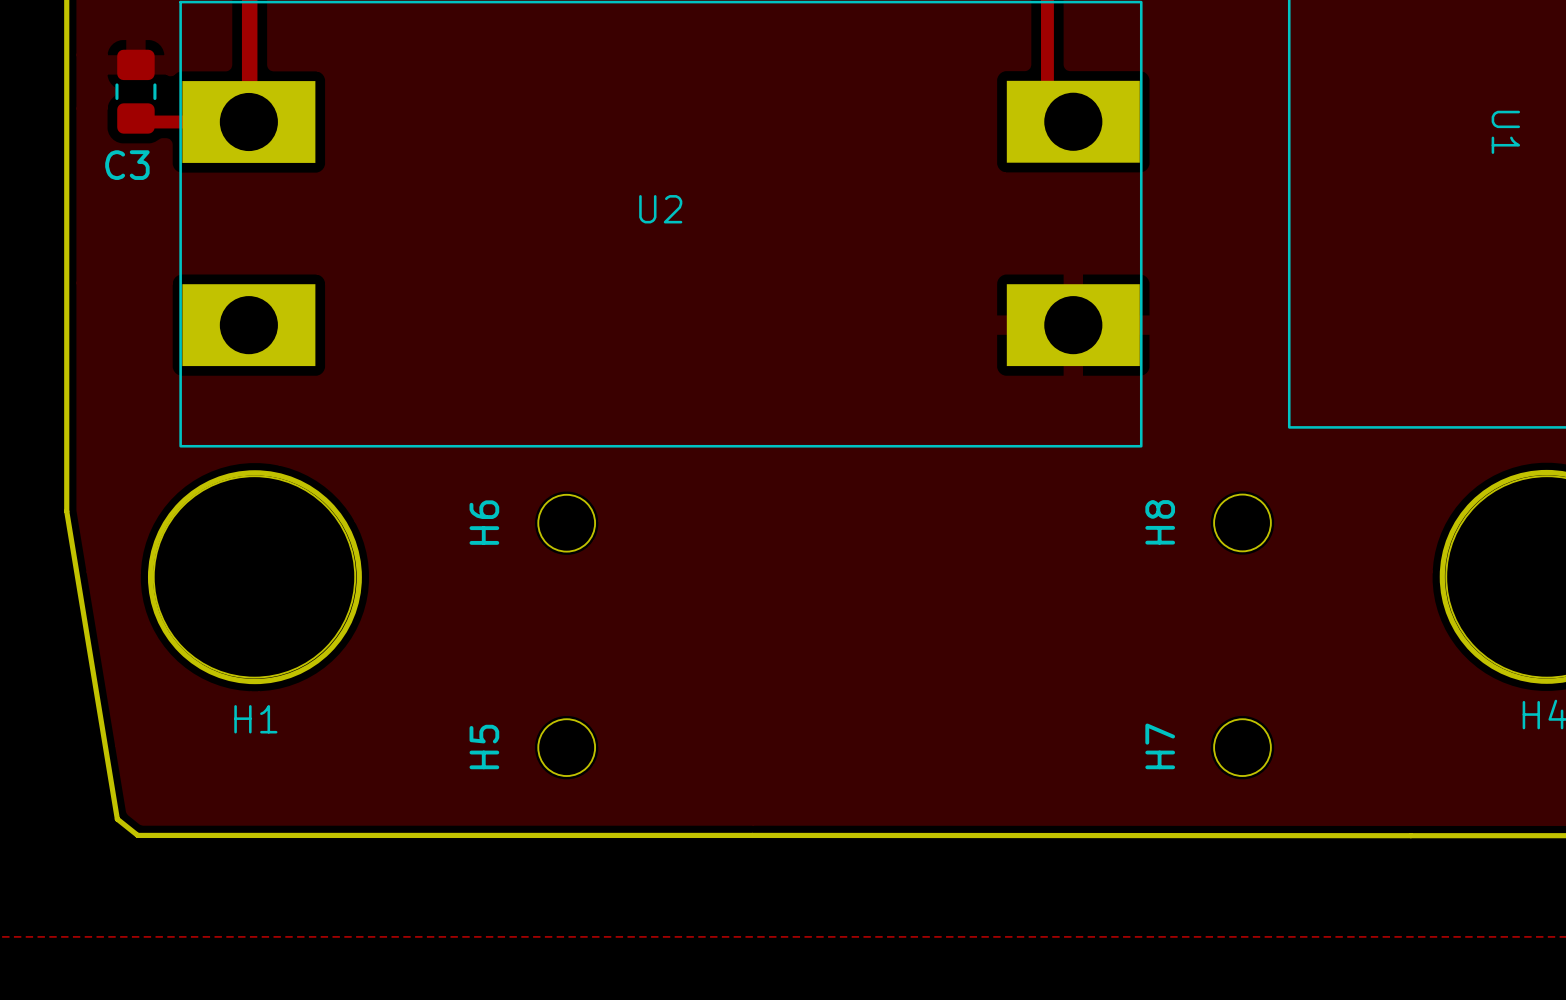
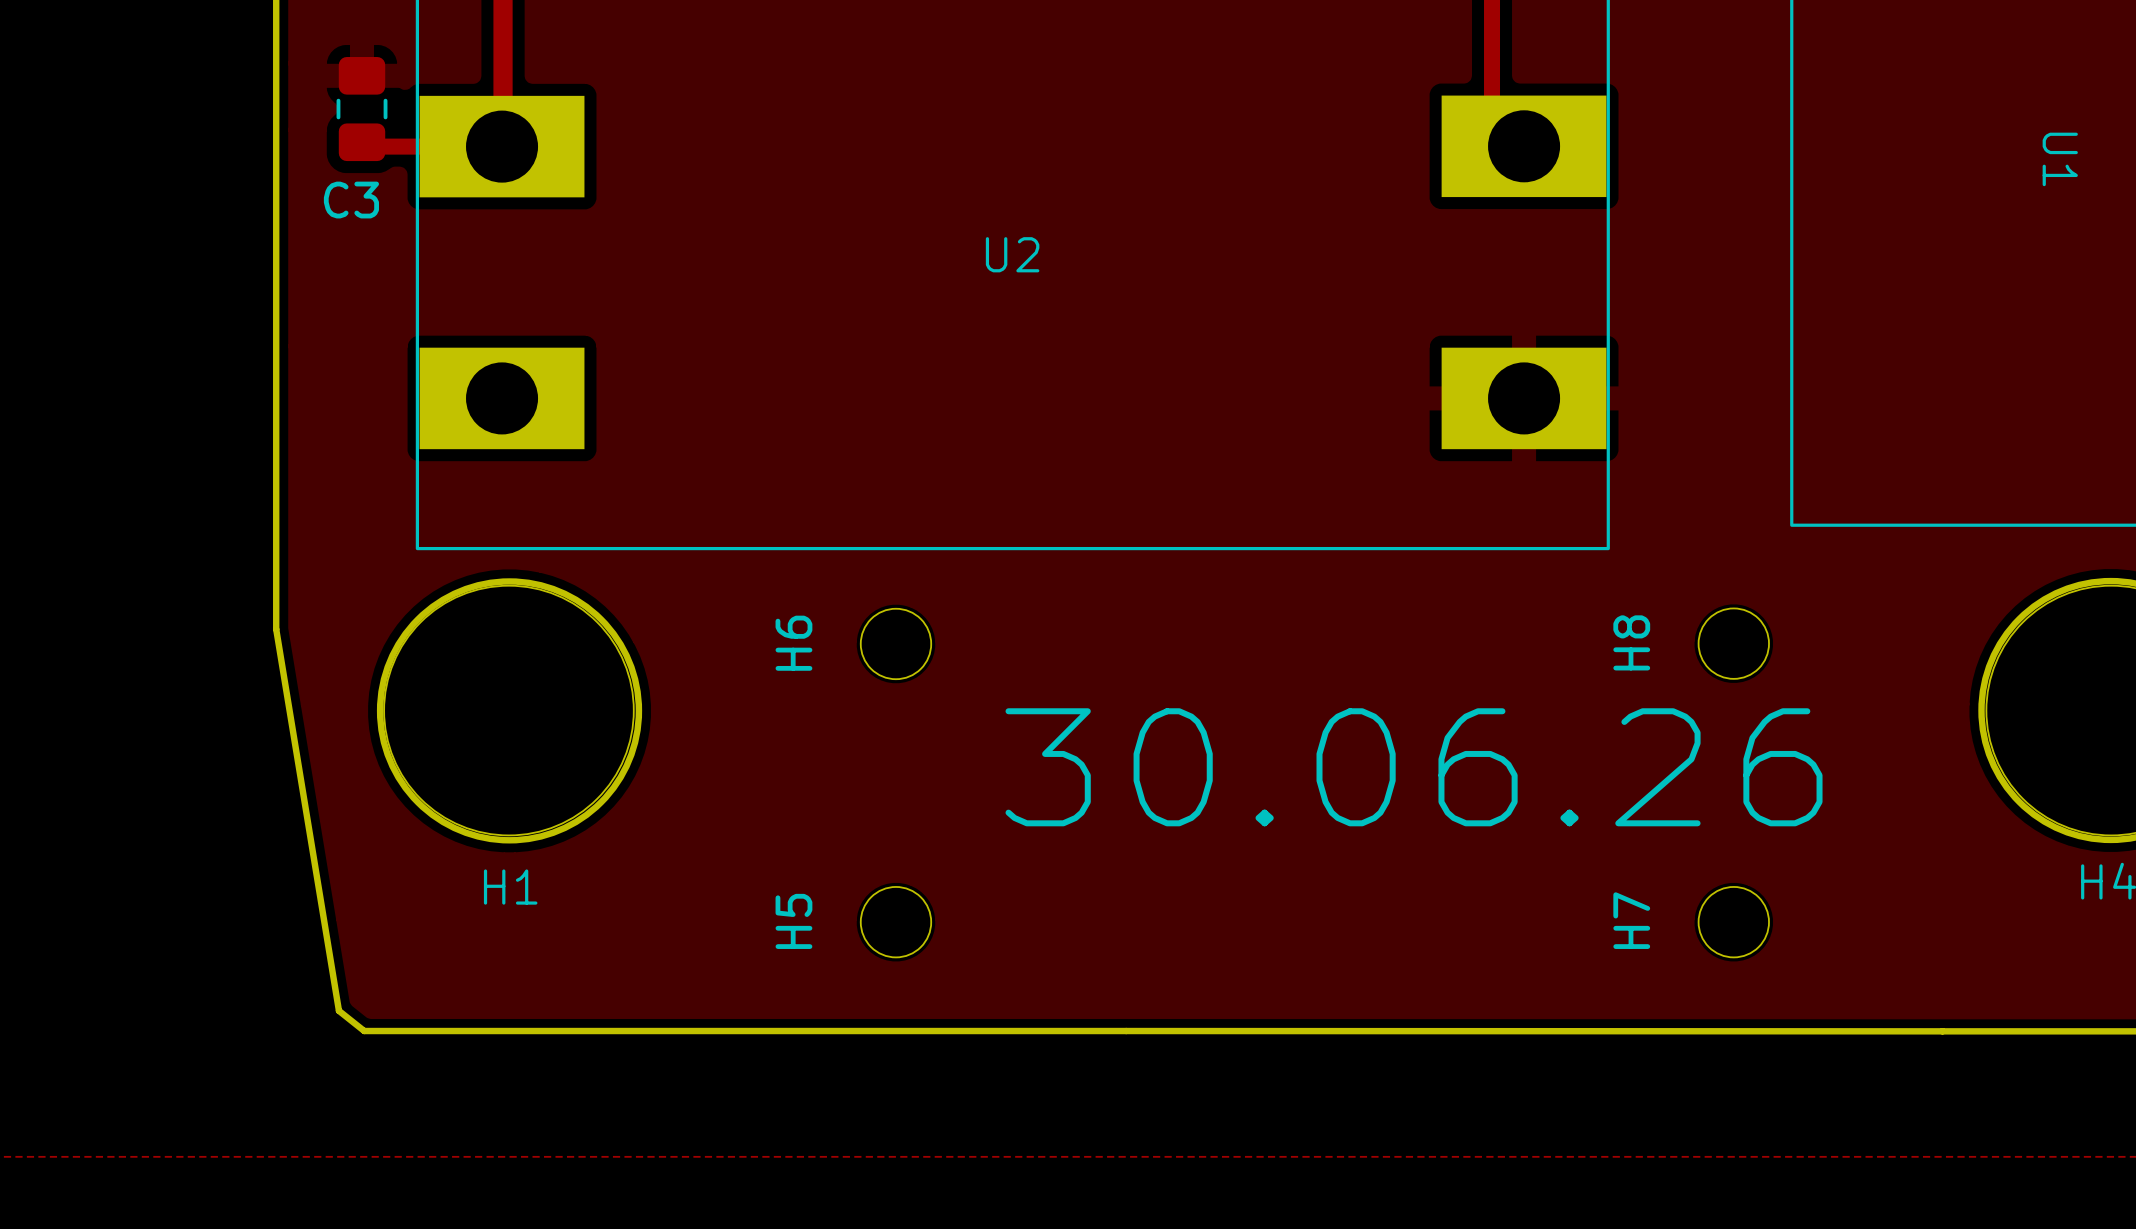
text: none -> 30.06.26 (1414, 767)

